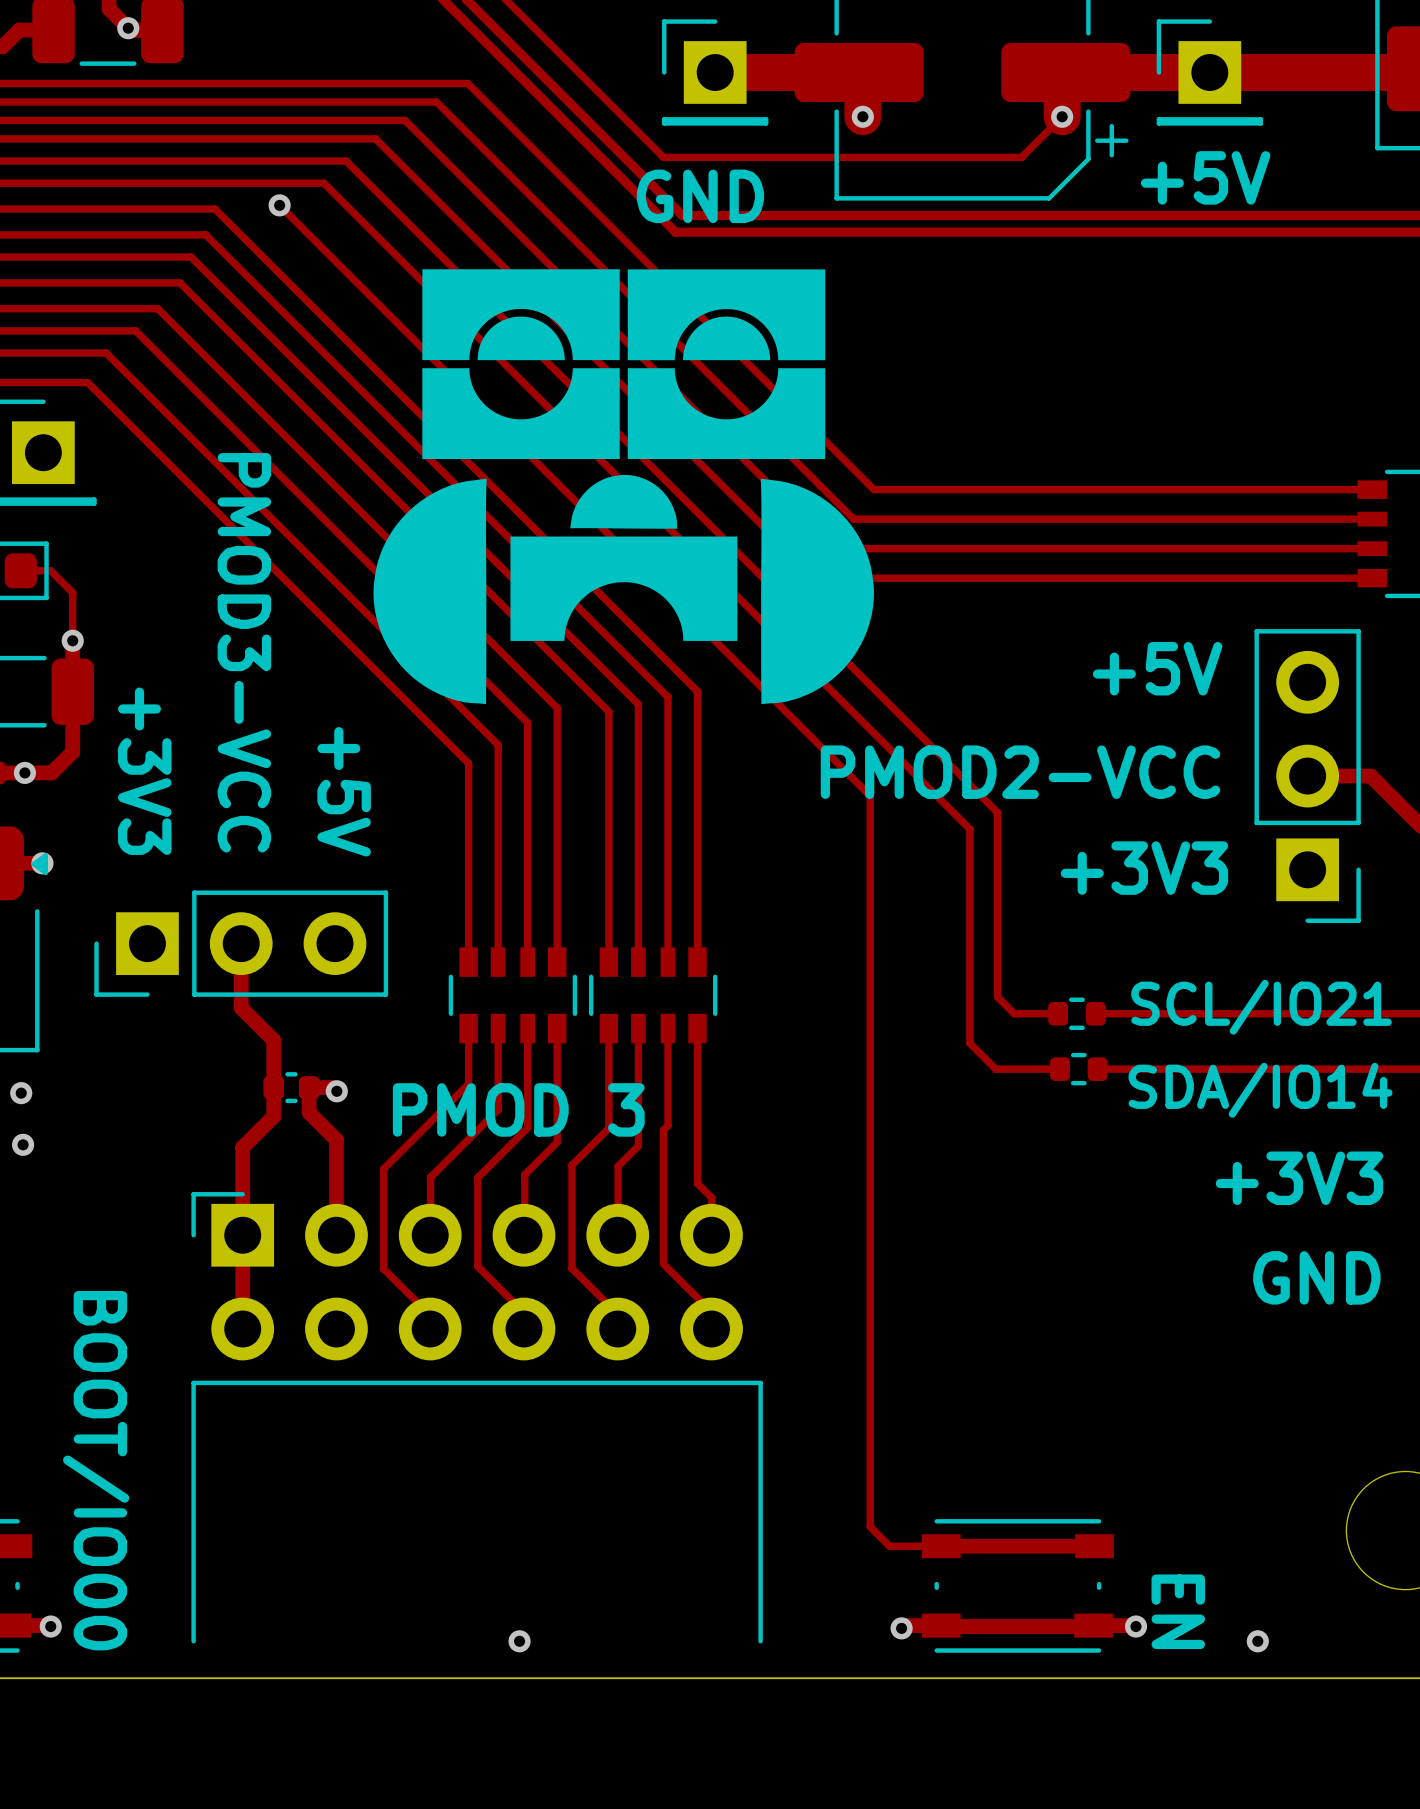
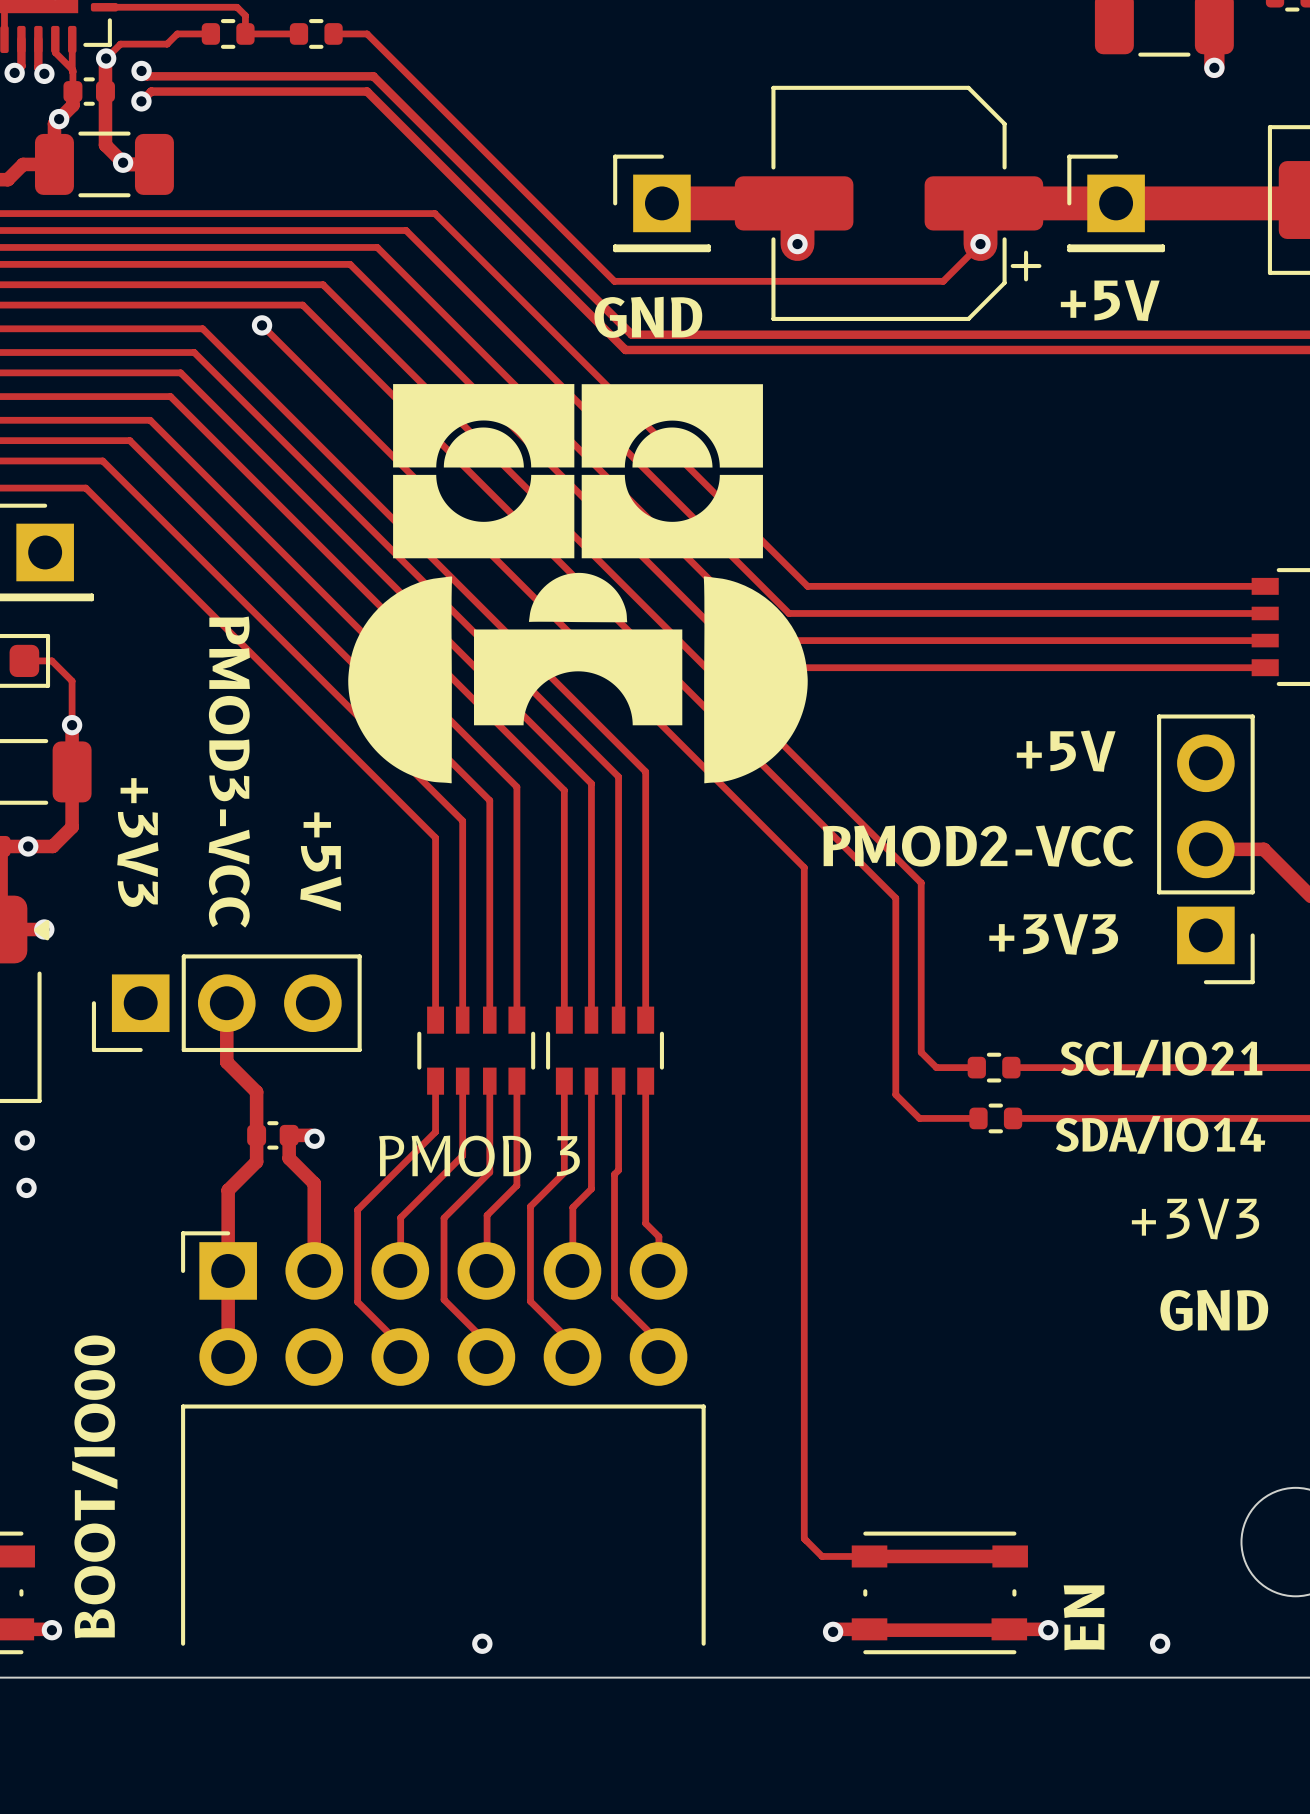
text rotation: 0° (96, 1470) -> 180° (94, 1486)
text rotation: 0° (1178, 1611) -> 180° (1084, 1617)

